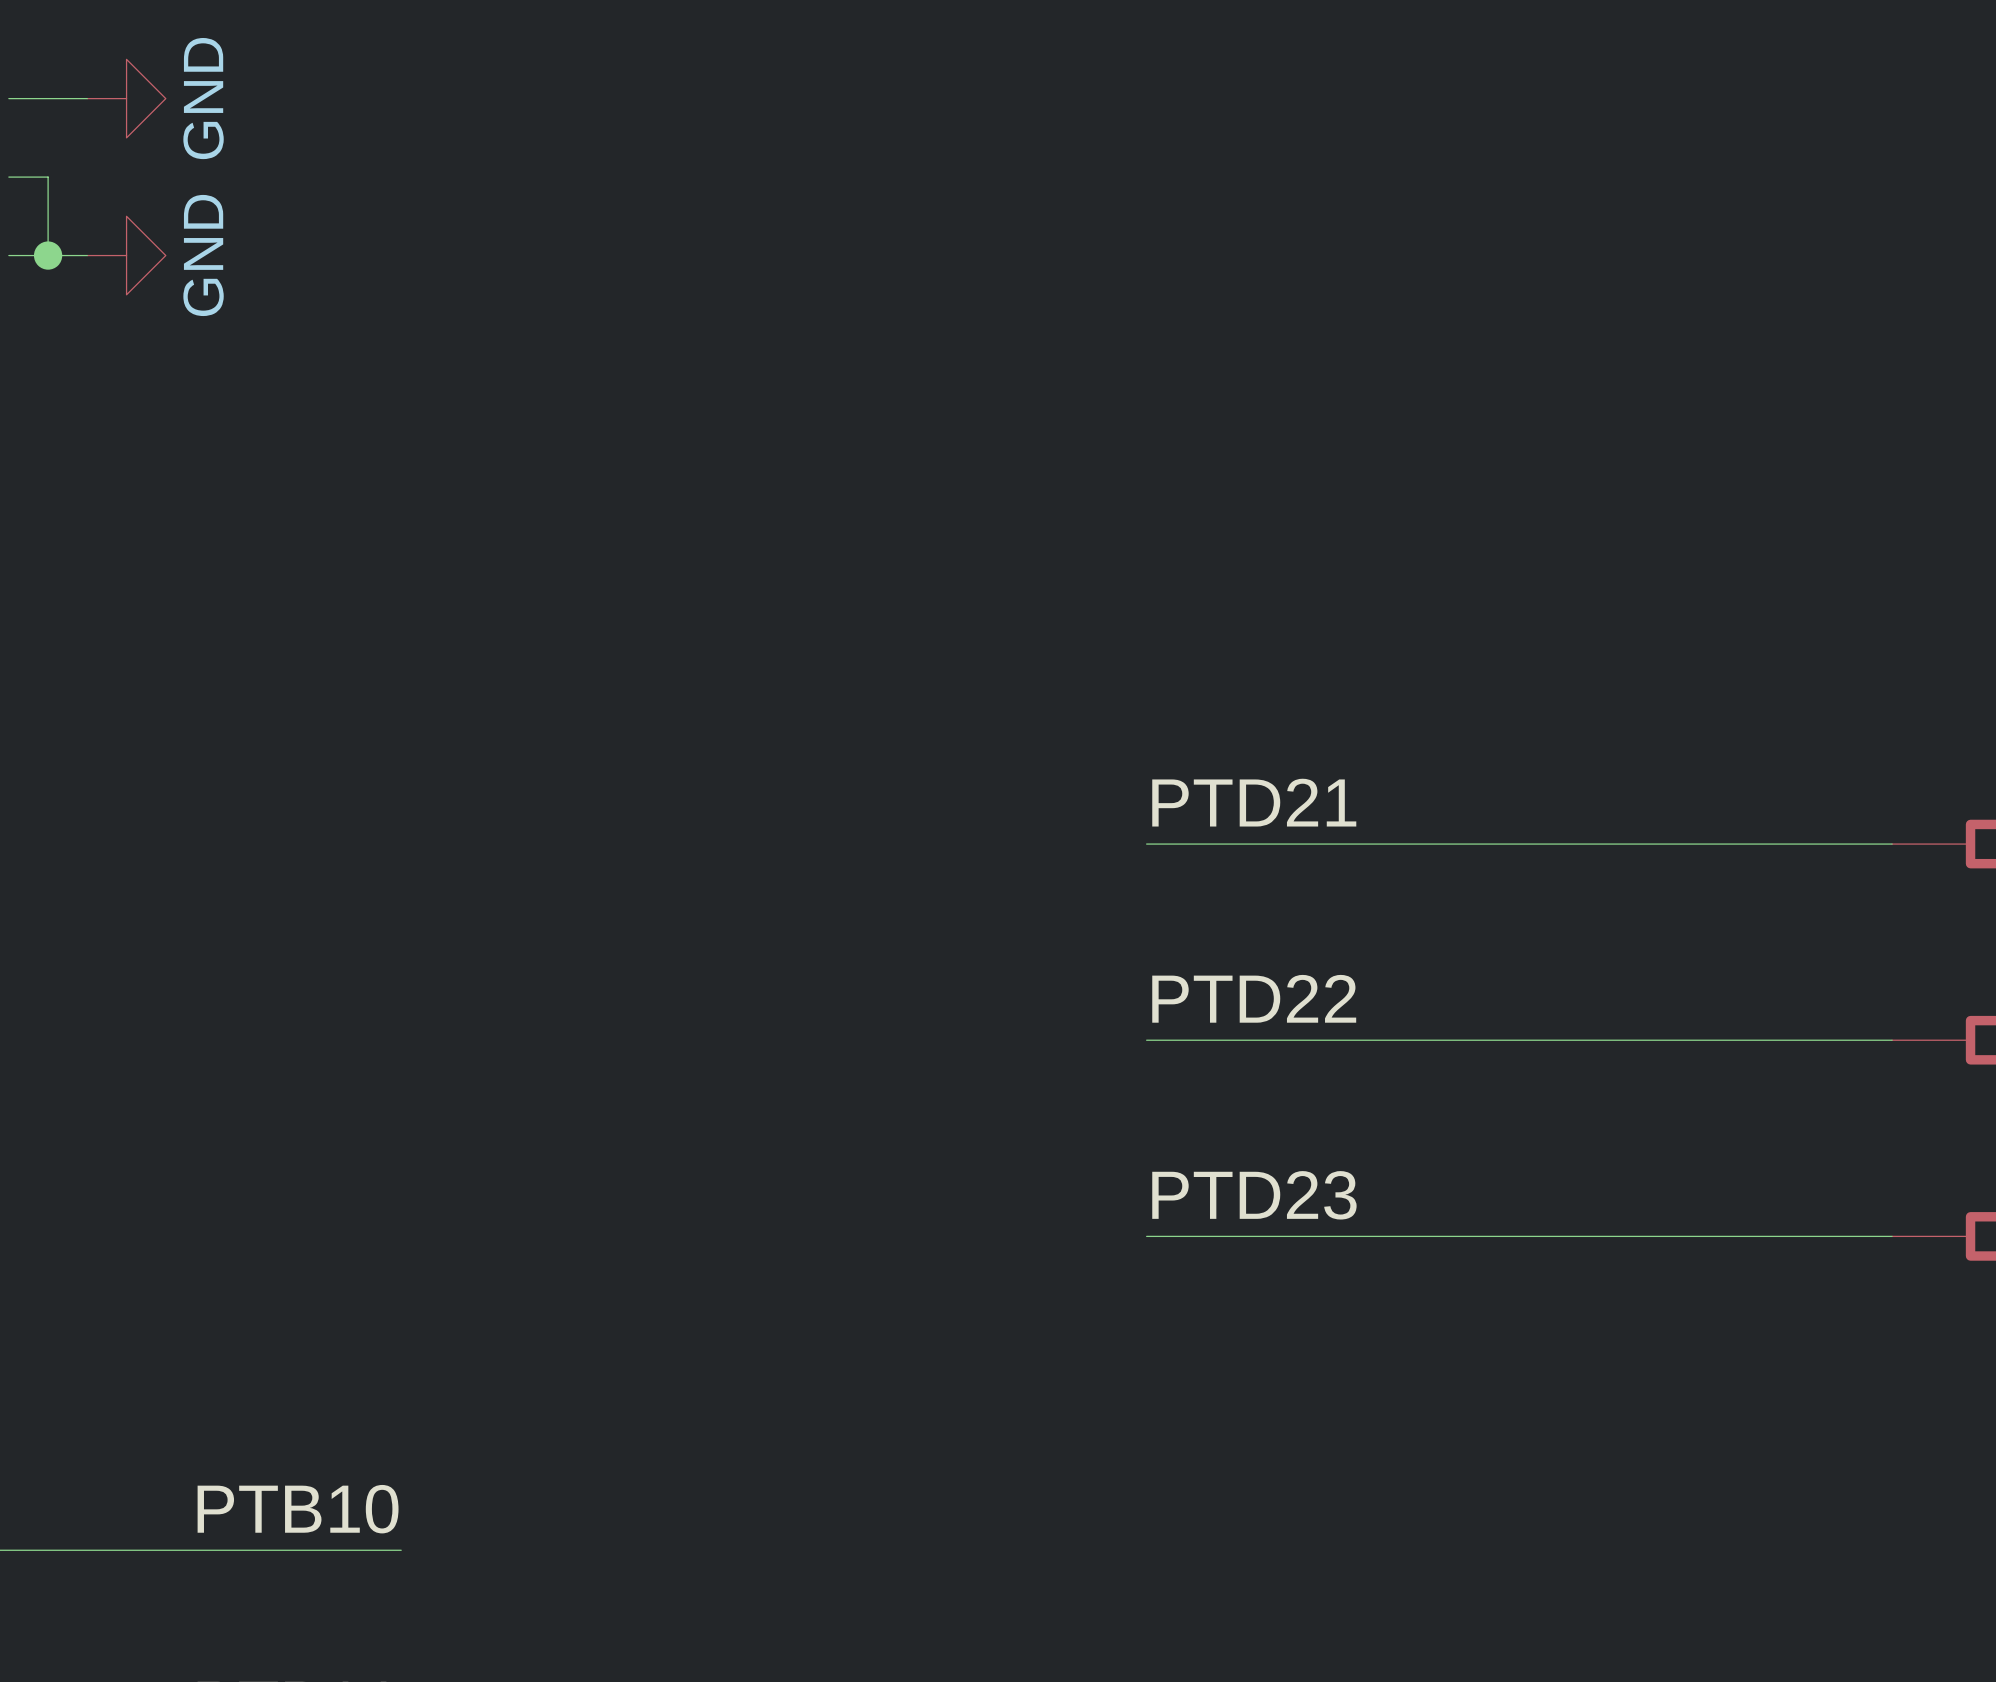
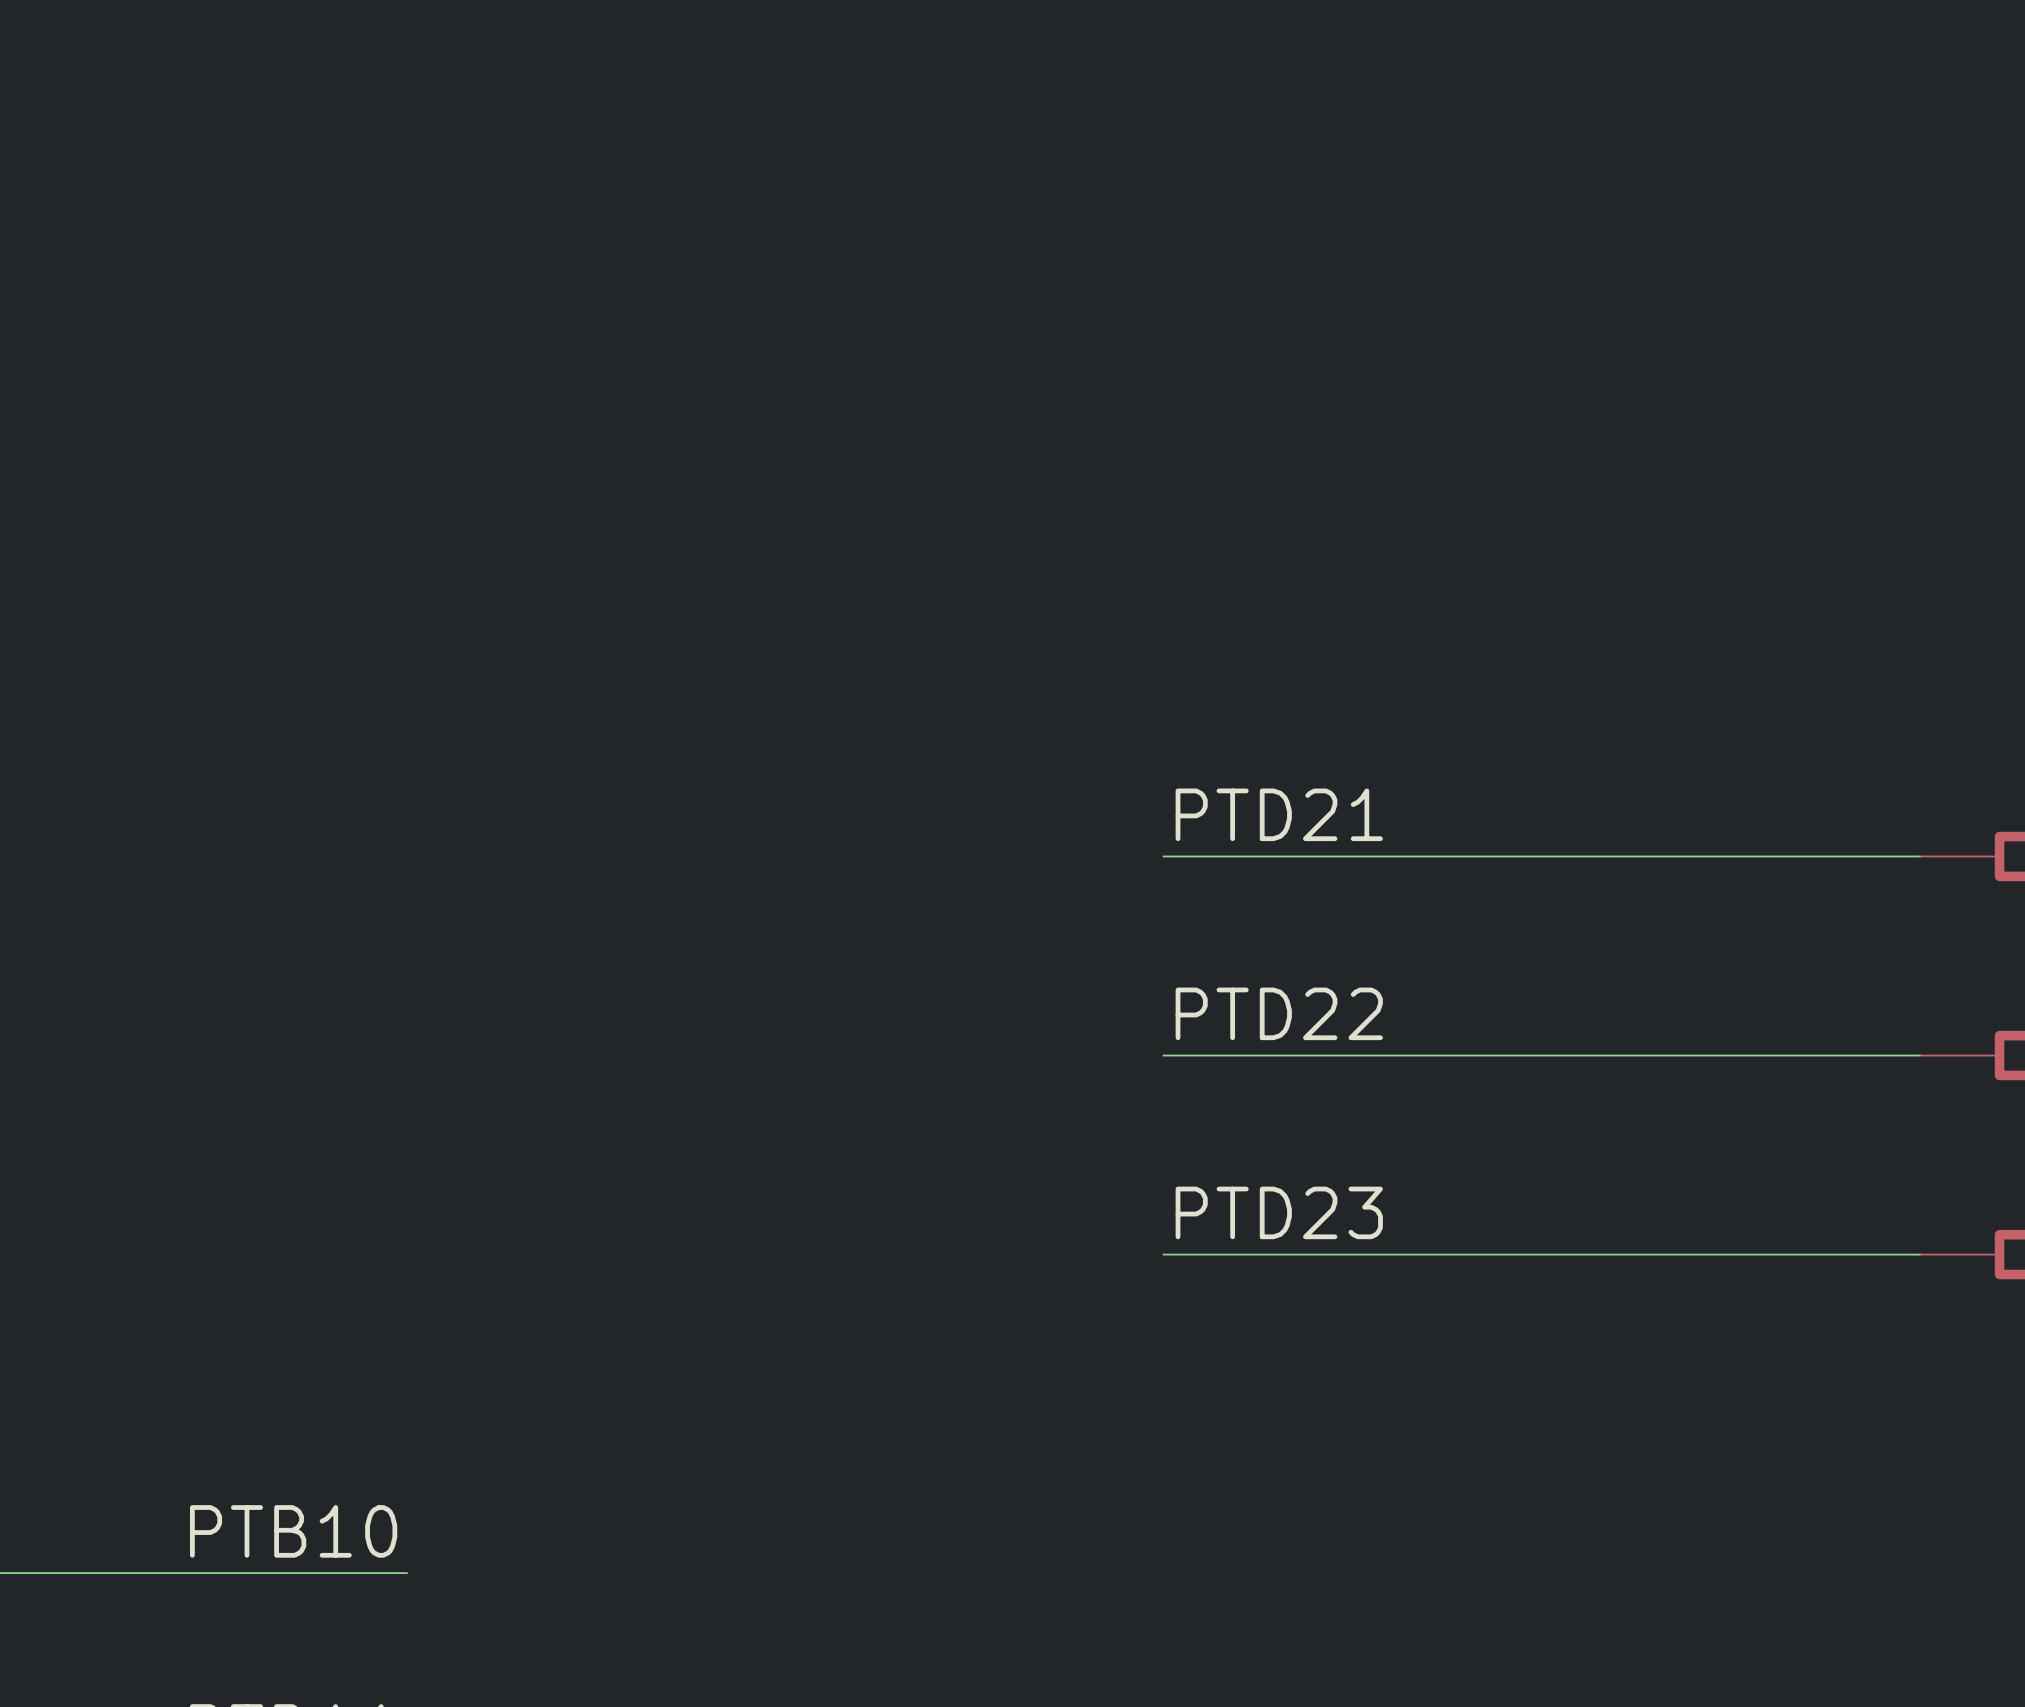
wire: (8, 98) (87, 98) -> none
power symbol: GND (126, 98) -> none
wire: (8, 177) (48, 177) (48, 255) -> none
wire: (8, 255) (87, 255) -> none
junction: (48, 255) -> none
power symbol: GND (126, 255) -> none

